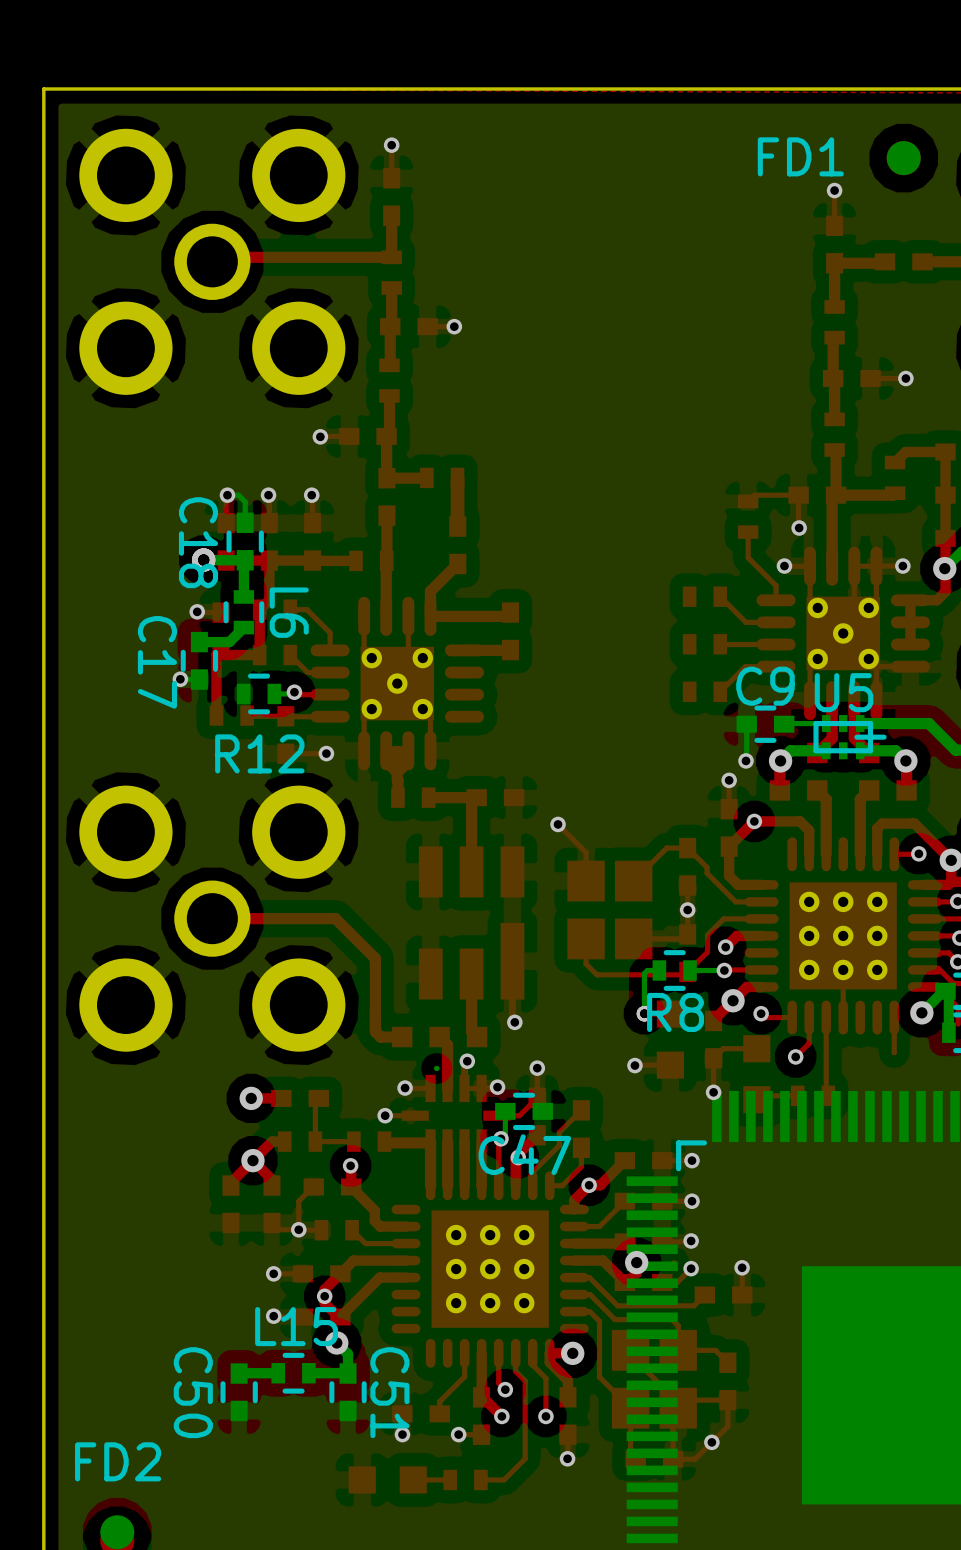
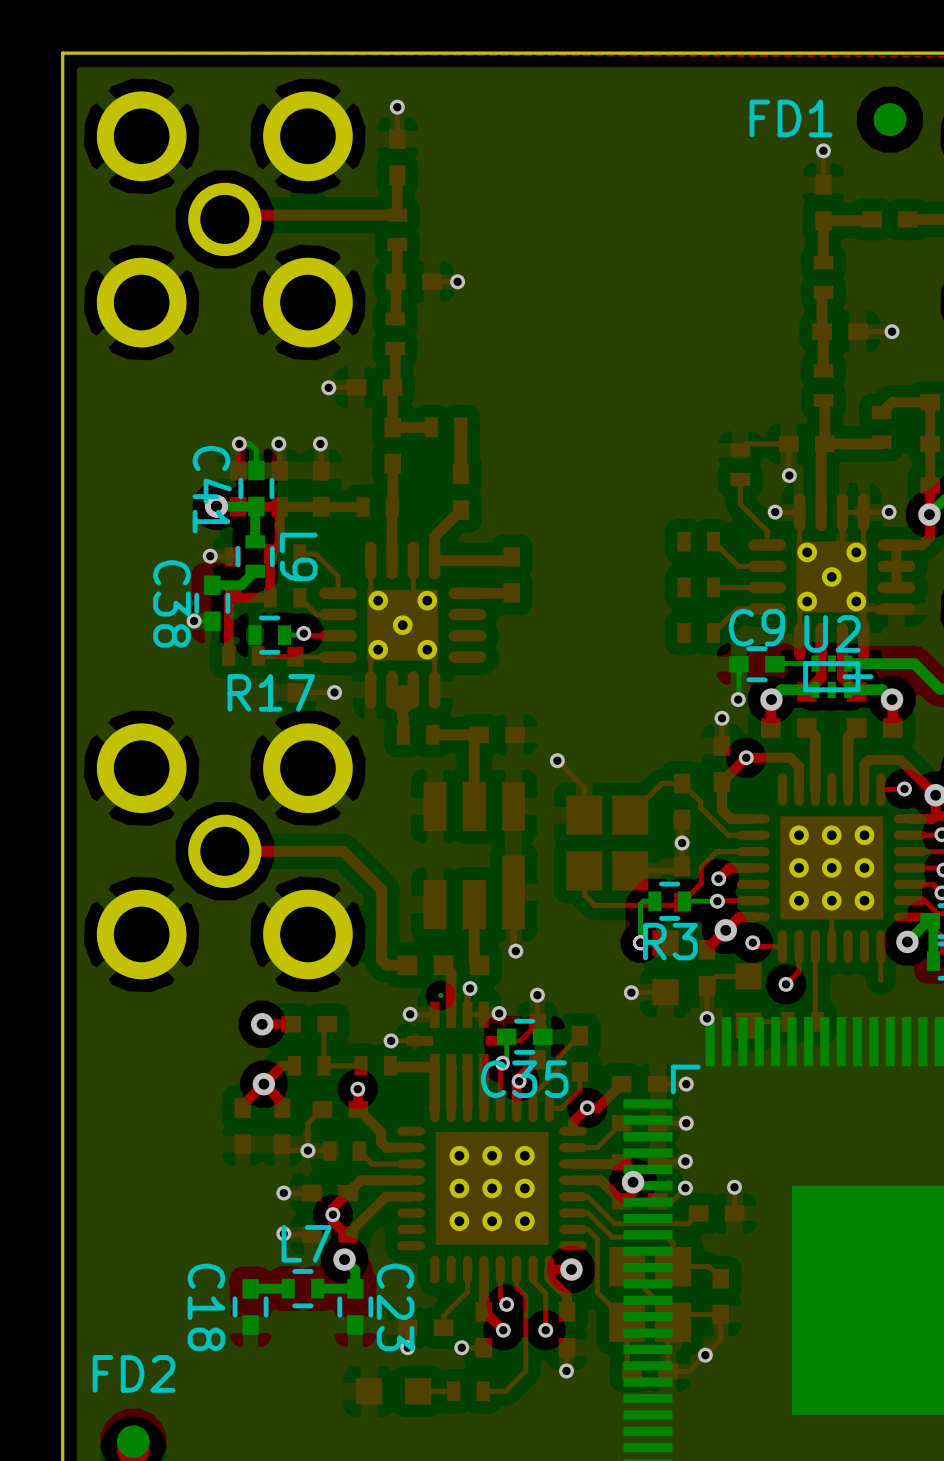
C18 name: C18 (198, 542) -> C41 (212, 489)
L6 name: L6 (289, 612) -> L9 (298, 556)
C17 name: C17 (157, 662) -> C38 (171, 603)
U5 name: U5 (844, 692) -> U2 (832, 633)
R12 name: R12 (259, 753) -> R17 (271, 692)
R8 name: R8 (675, 1012) -> R3 (670, 941)
C47 name: C47 (524, 1154) -> C35 (524, 1079)
L15 name: L15 (296, 1326) -> L7 (306, 1243)
C50 name: C50 (193, 1392) -> C18 (206, 1307)
C51 name: C51 (389, 1392) -> C23 (395, 1307)

